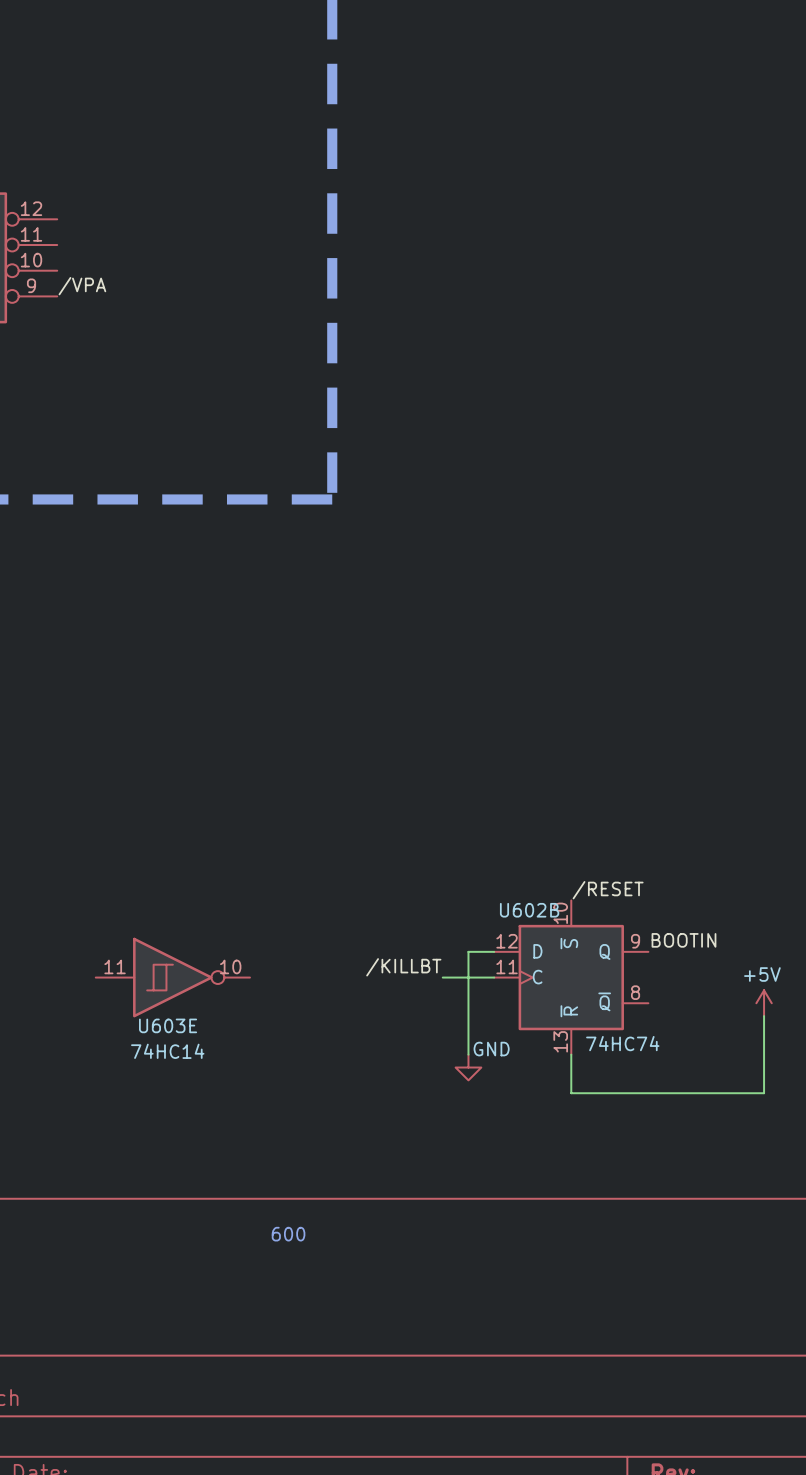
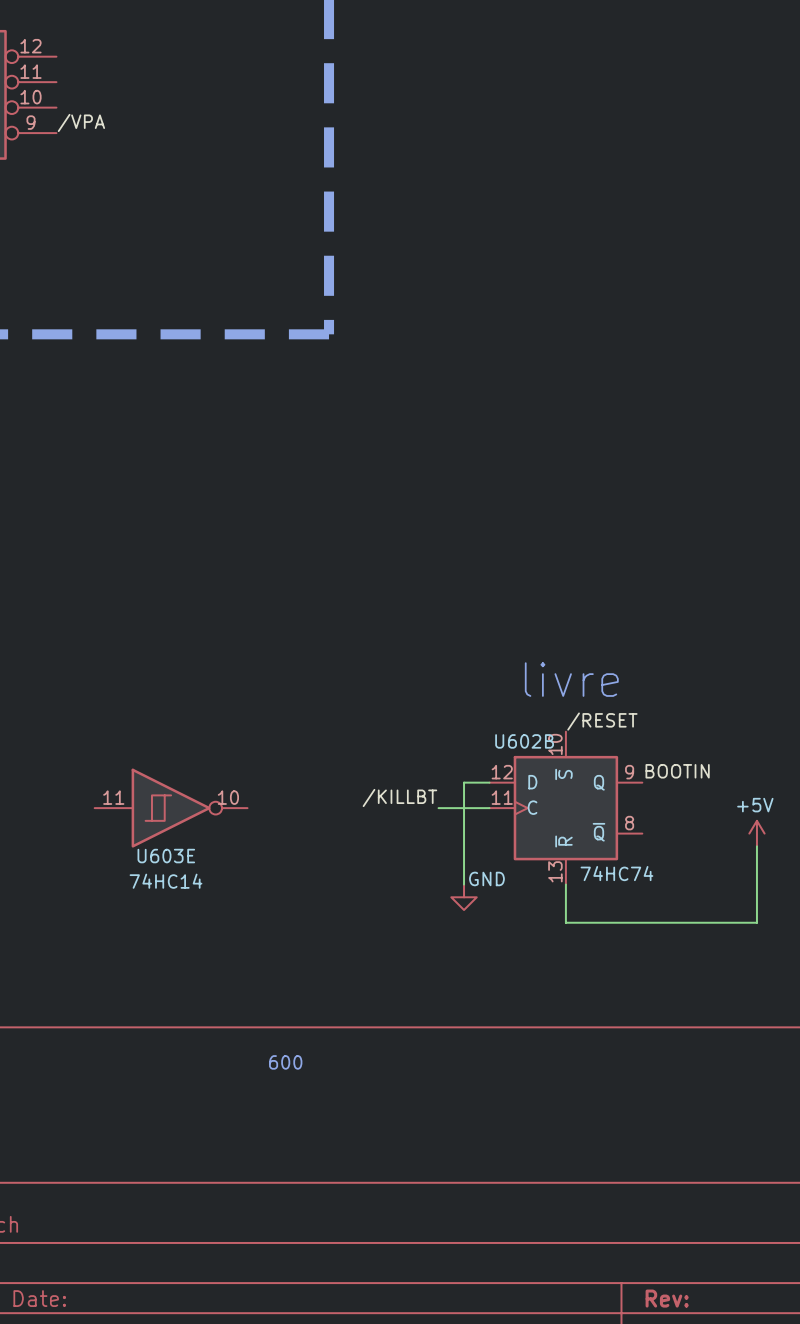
text: none -> livre (571, 679)

